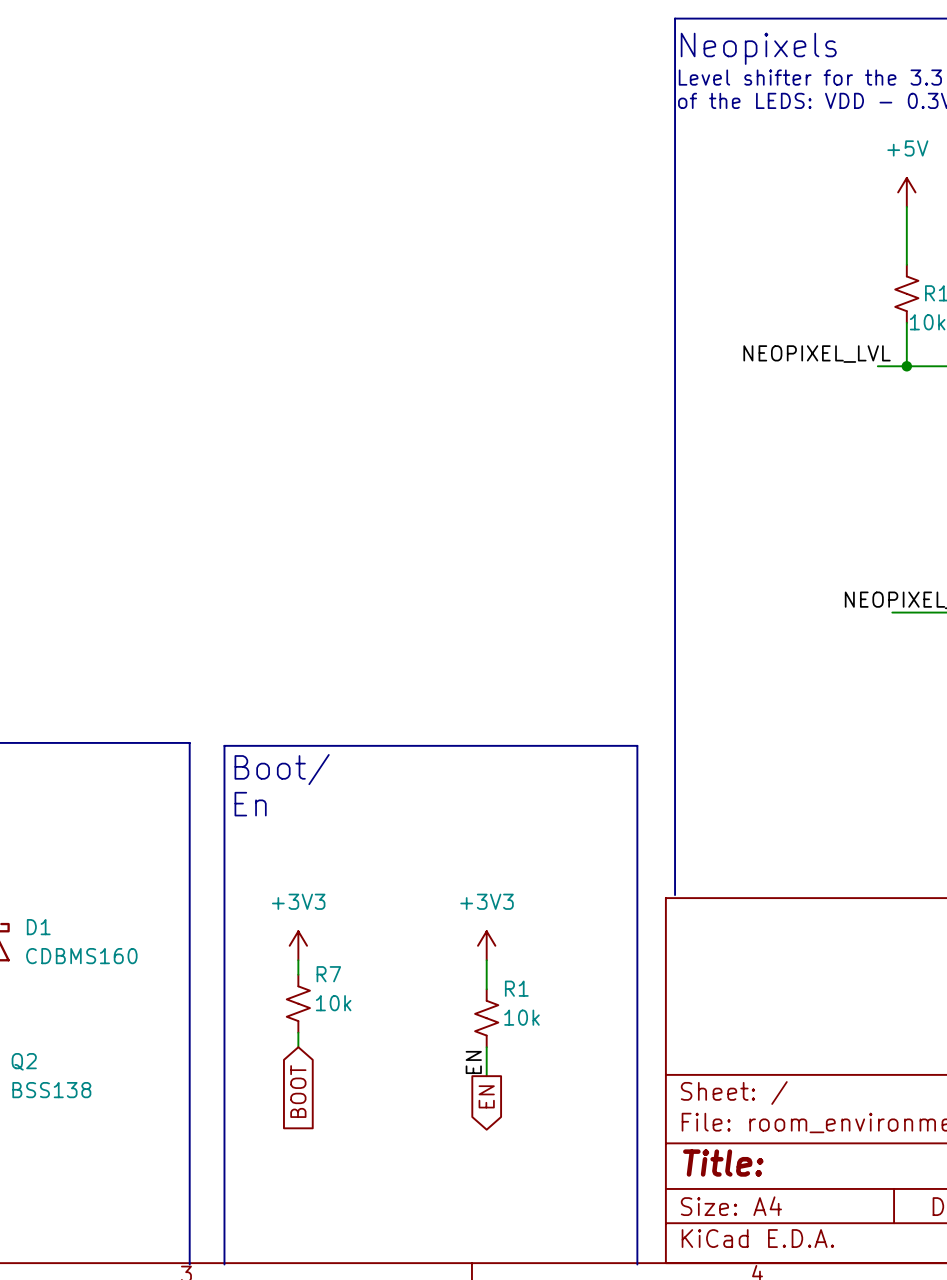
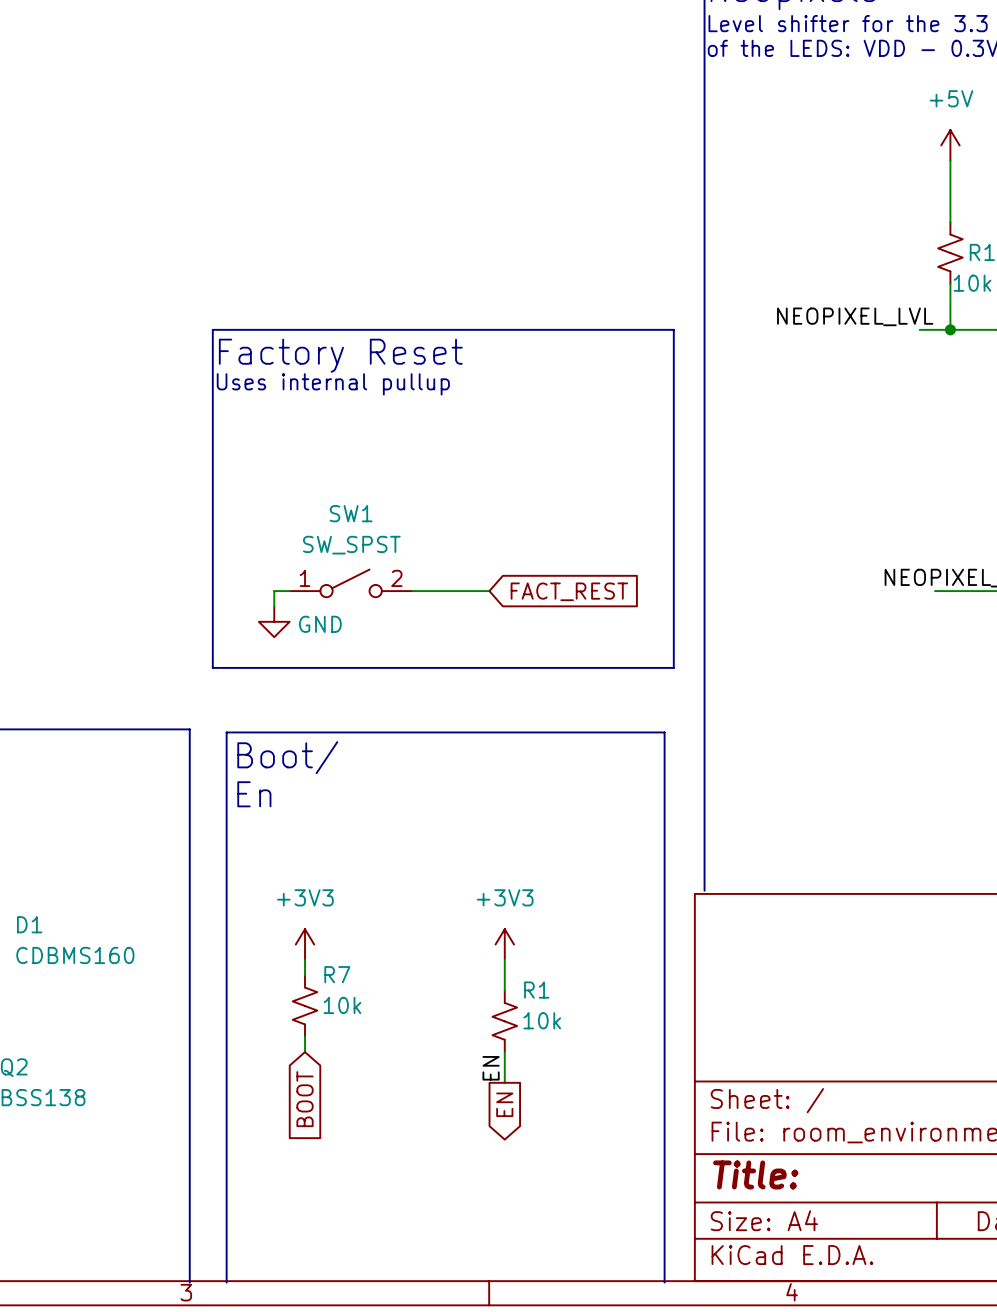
line: none -> (212, 329) (212, 667) (673, 667) (673, 329) (212, 329)
text: none -> Factory Reset (340, 355)
text: none -> Uses internal pullup (333, 384)
SW1: none -> SW_SPST (351, 583)
wire: none -> (289, 591) (274, 591) (274, 606)
wire: none -> (412, 591) (489, 591)
global label: none -> FACT_REST (569, 591)
power symbol: none -> GND (274, 621)

